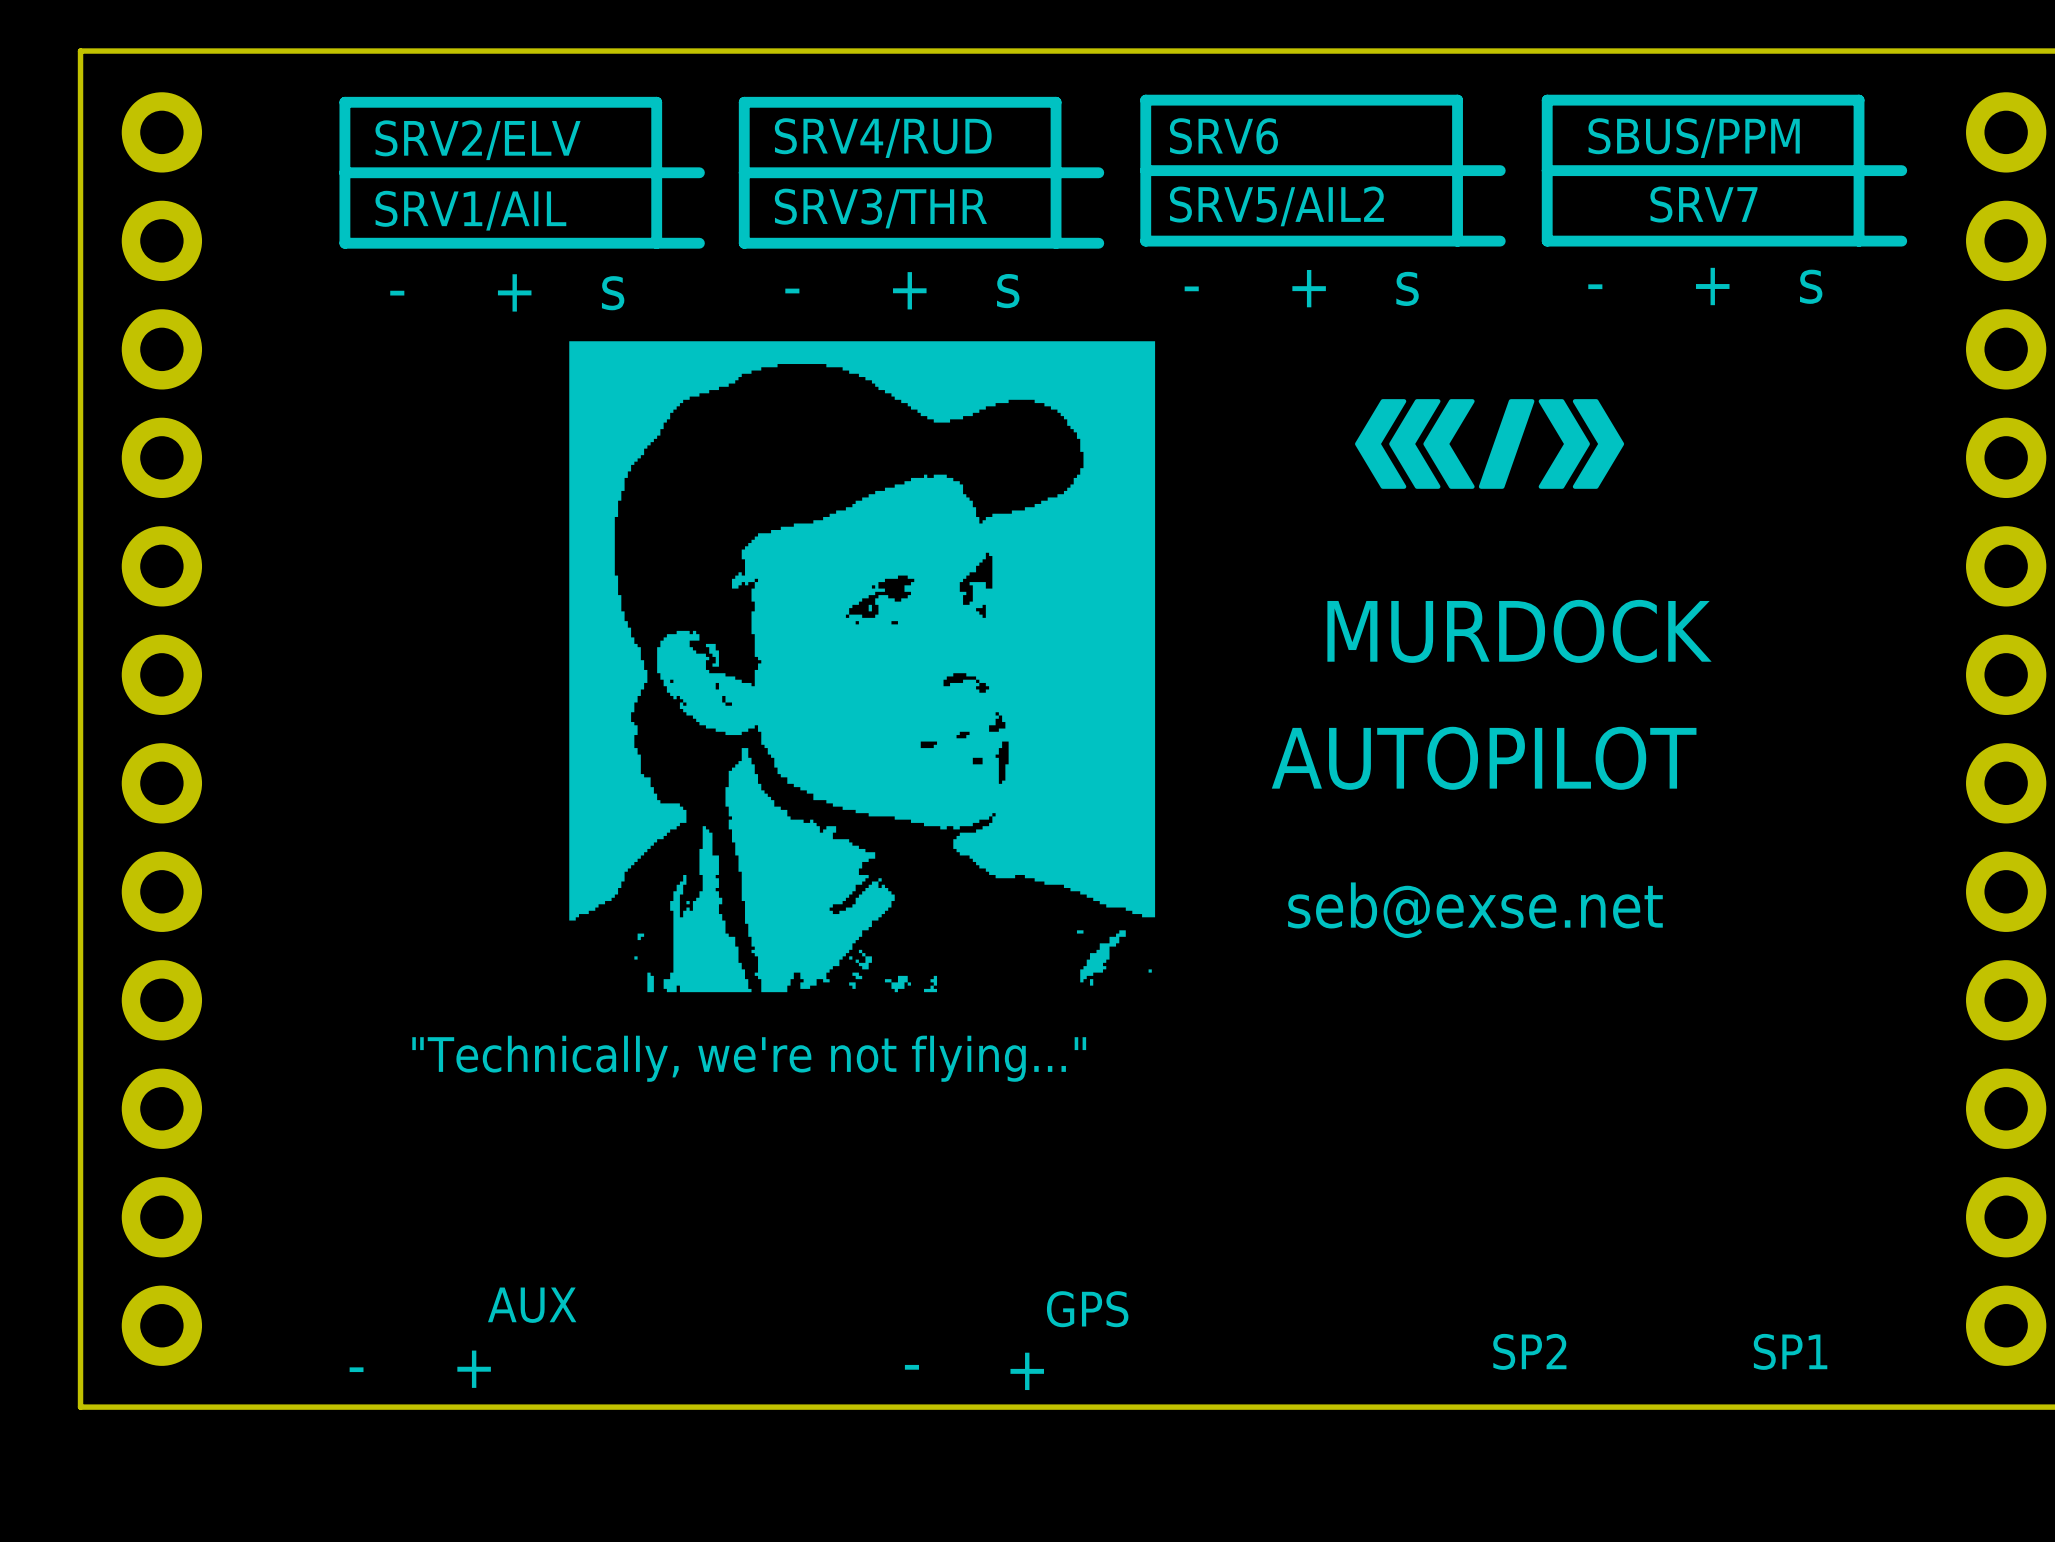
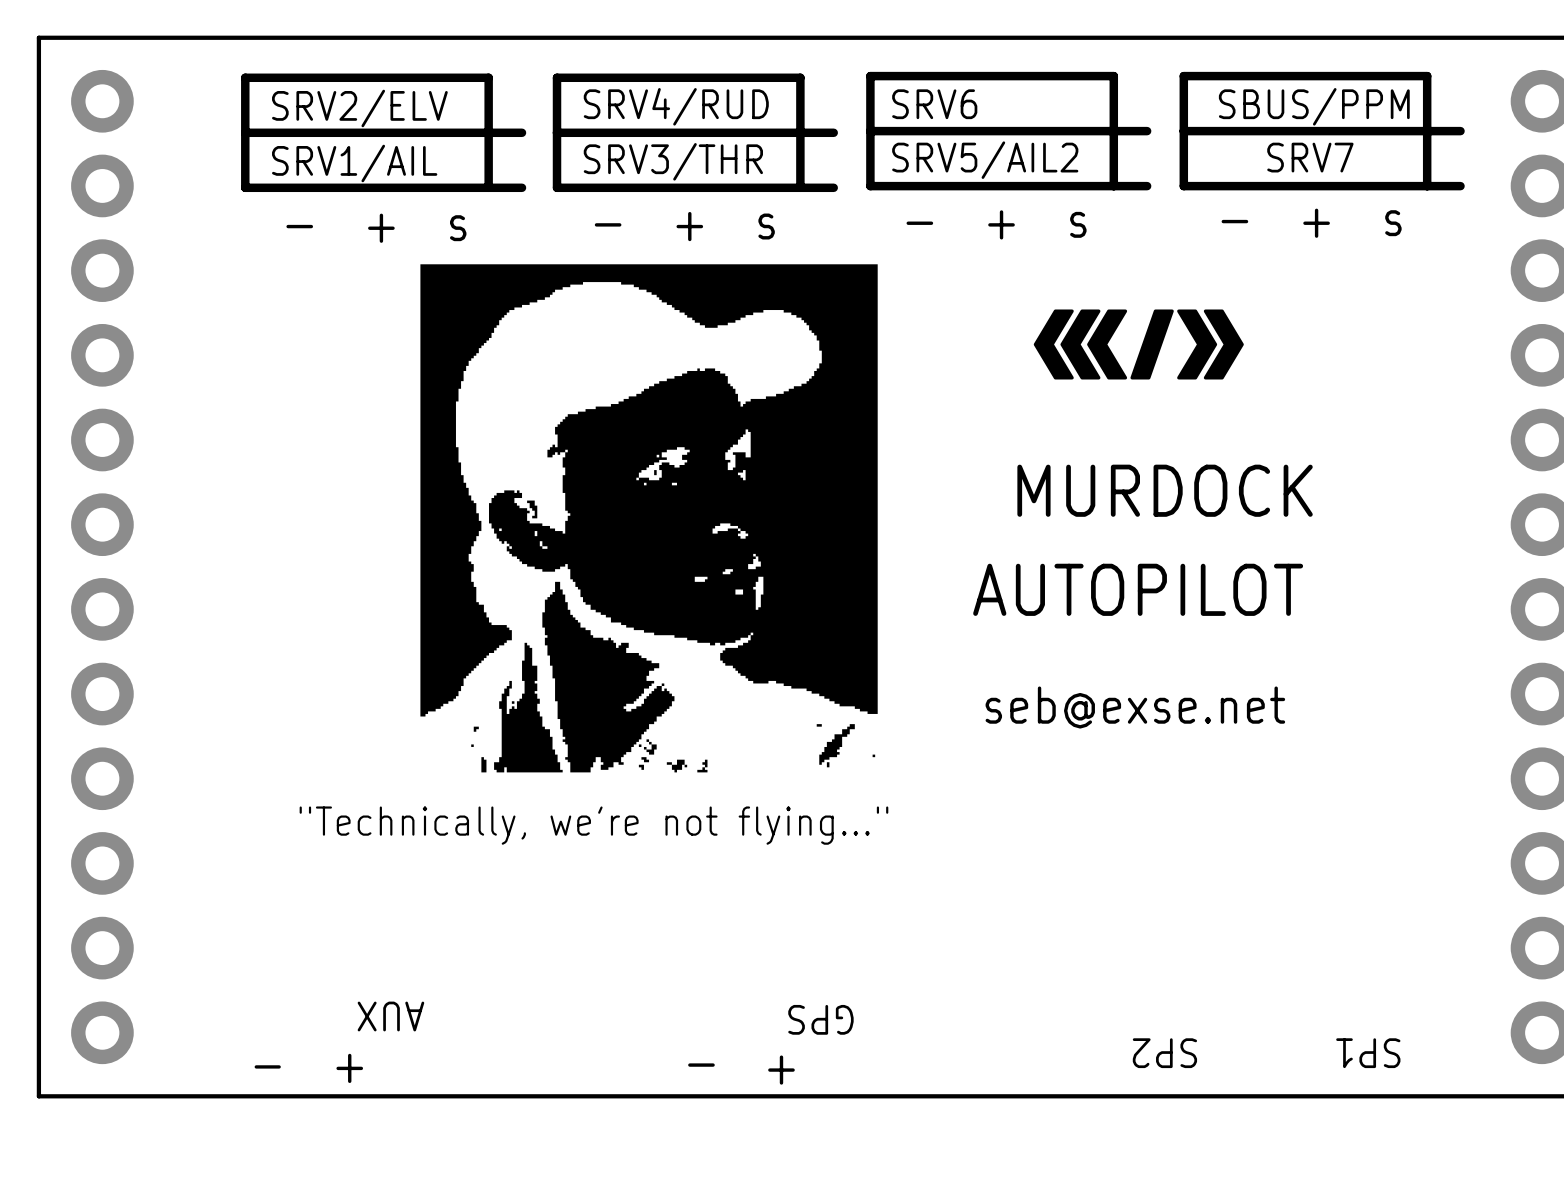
text rotation: 0° (532, 1305) -> 180° (390, 1016)
text rotation: 0° (1087, 1309) -> 180° (820, 1019)
text rotation: 0° (1529, 1351) -> 180° (1164, 1053)
text rotation: 0° (1790, 1351) -> 180° (1368, 1053)

